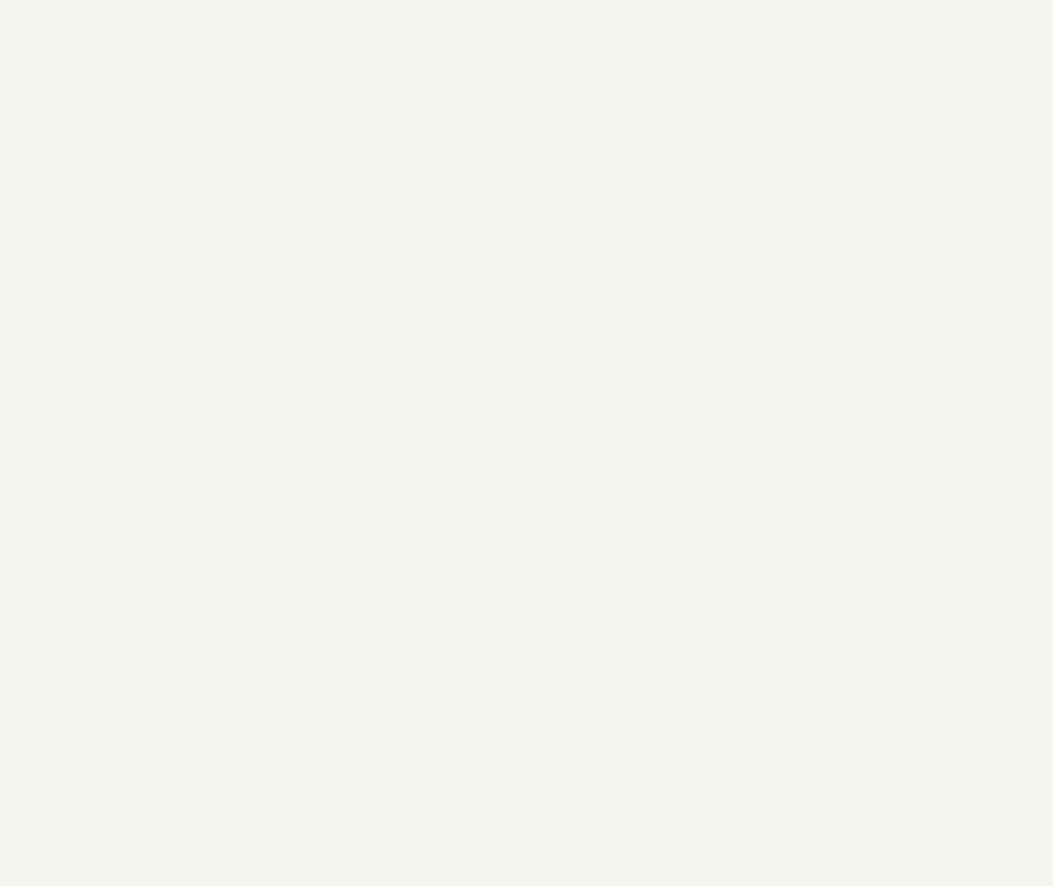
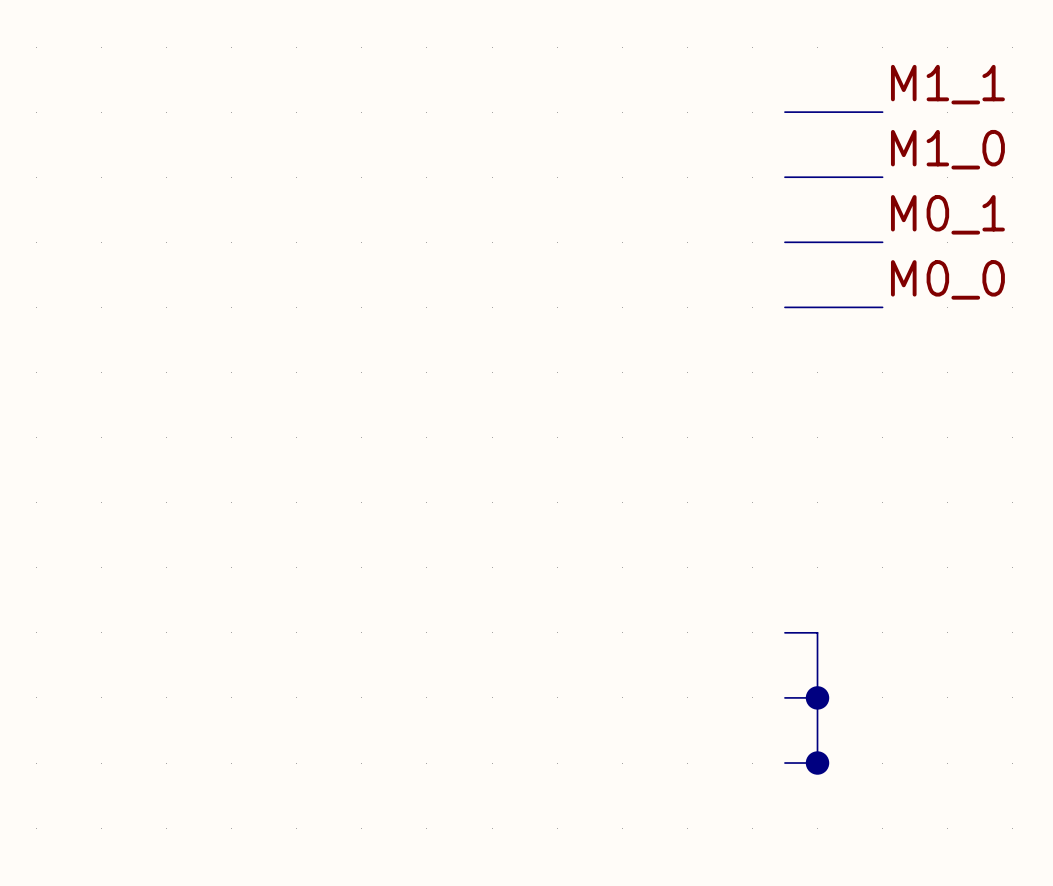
label: none -> M1_1 (947, 84)
wire: none -> (784, 112) (882, 112)
label: none -> M1_0 (947, 149)
wire: none -> (784, 177) (882, 177)
label: none -> M0_1 (947, 214)
wire: none -> (784, 242) (882, 242)
label: none -> M0_0 (947, 279)
wire: none -> (784, 307) (882, 307)
wire: none -> (784, 632) (817, 632) (817, 763) (784, 763)
wire: none -> (784, 697) (817, 697)
junction: none -> (817, 697)
junction: none -> (817, 763)

